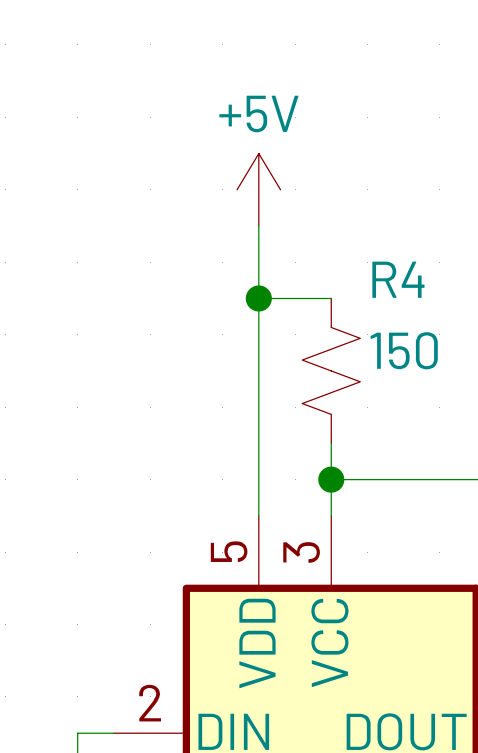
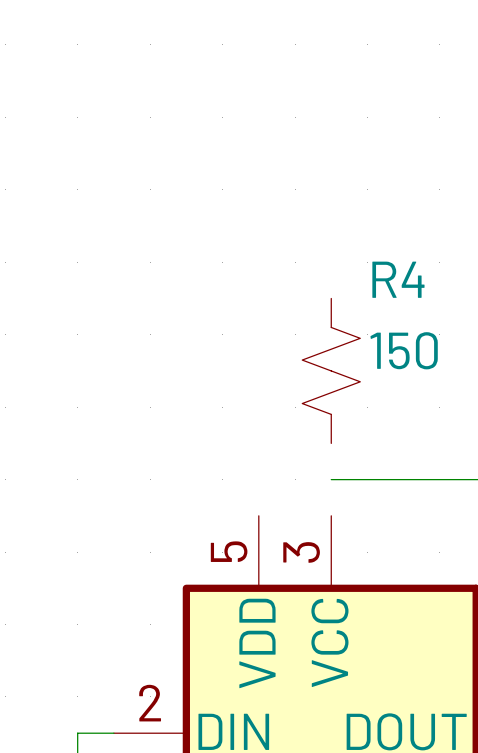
power symbol: +5V (258, 189) -> none
wire: (258, 226) (258, 515) -> none
wire: (258, 298) (331, 298) -> none
junction: (258, 298) -> none
wire: (331, 443) (331, 515) -> none
junction: (331, 479) -> none

